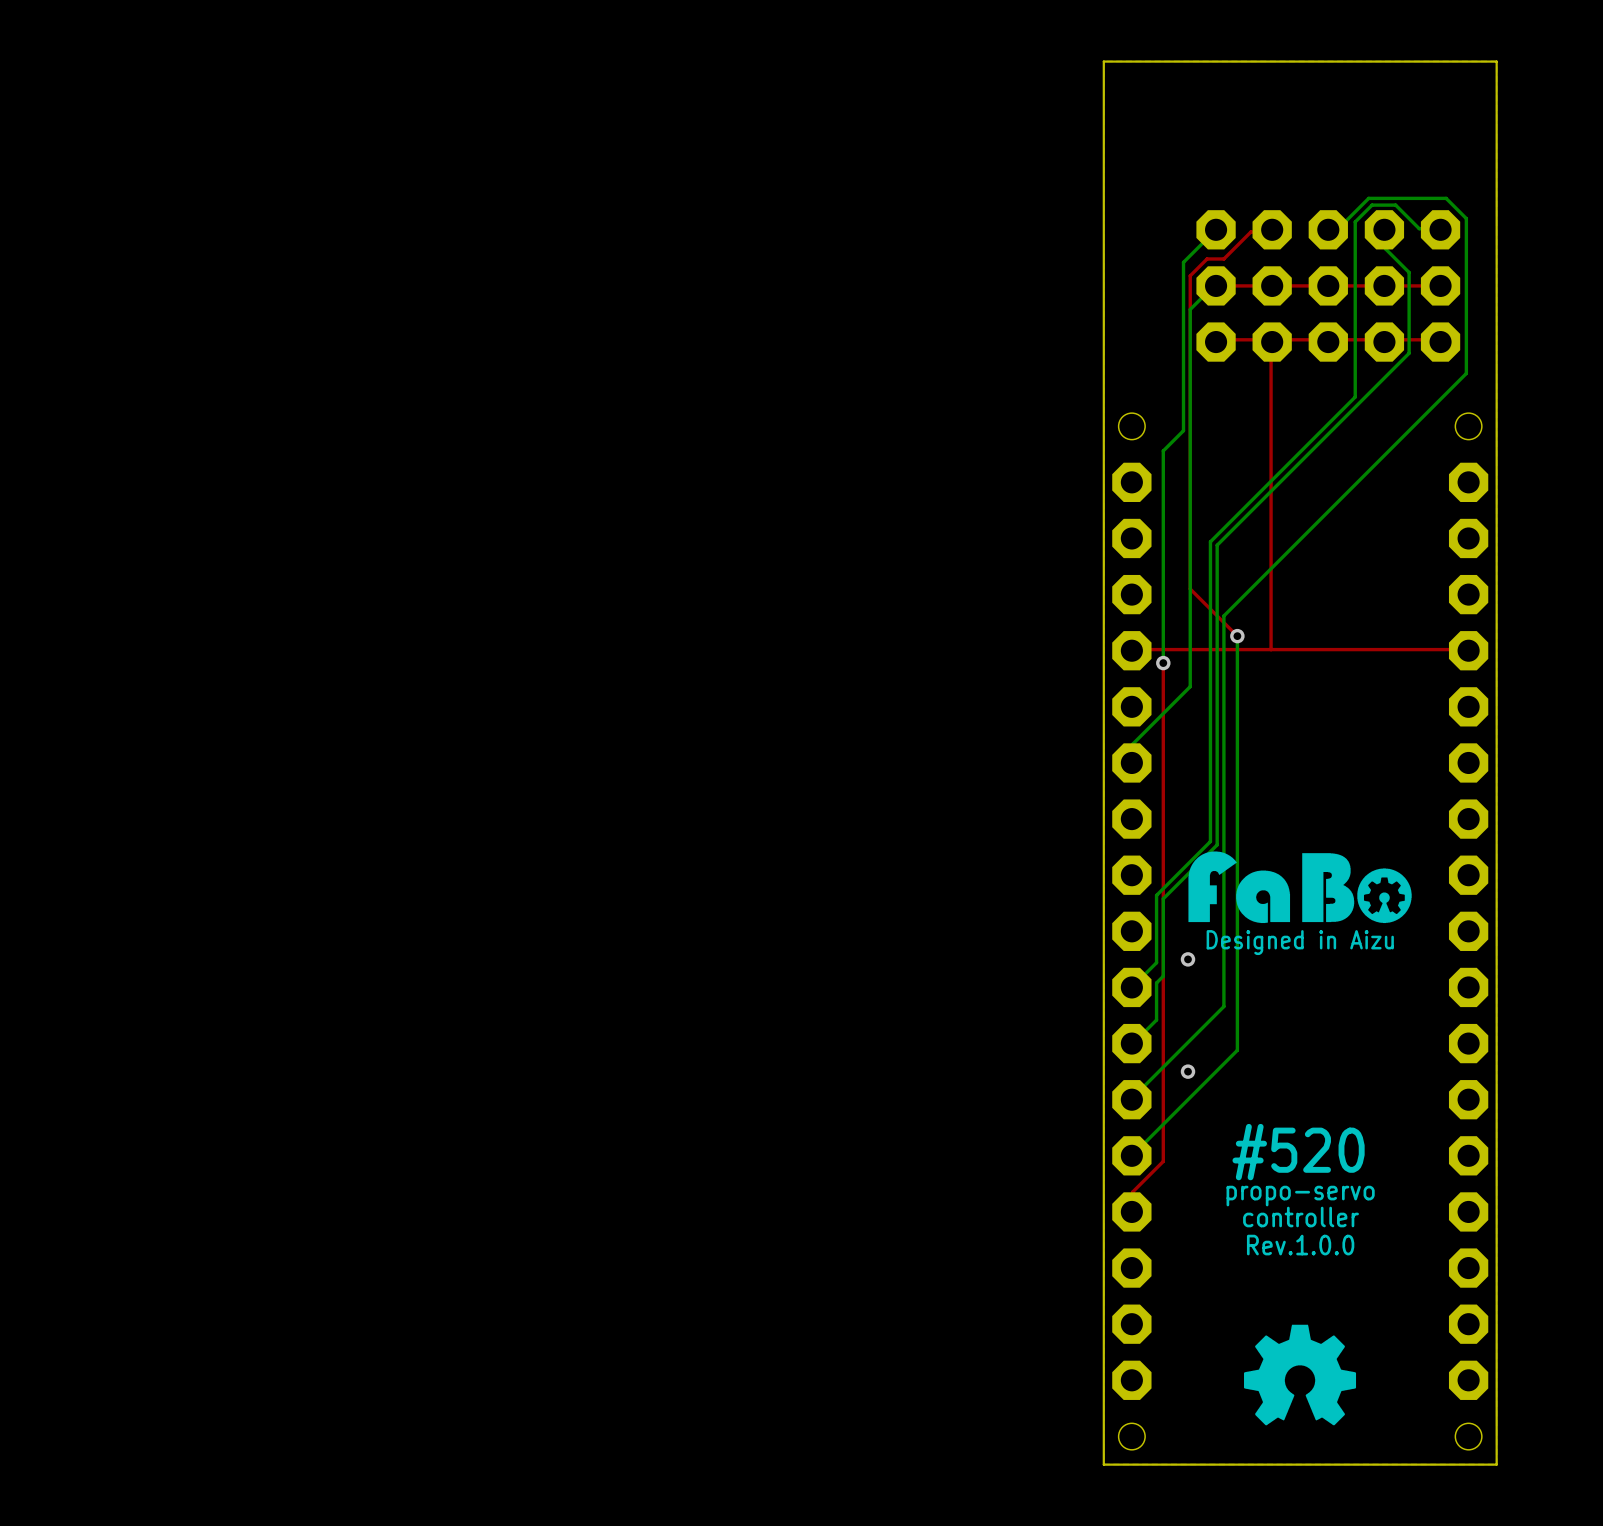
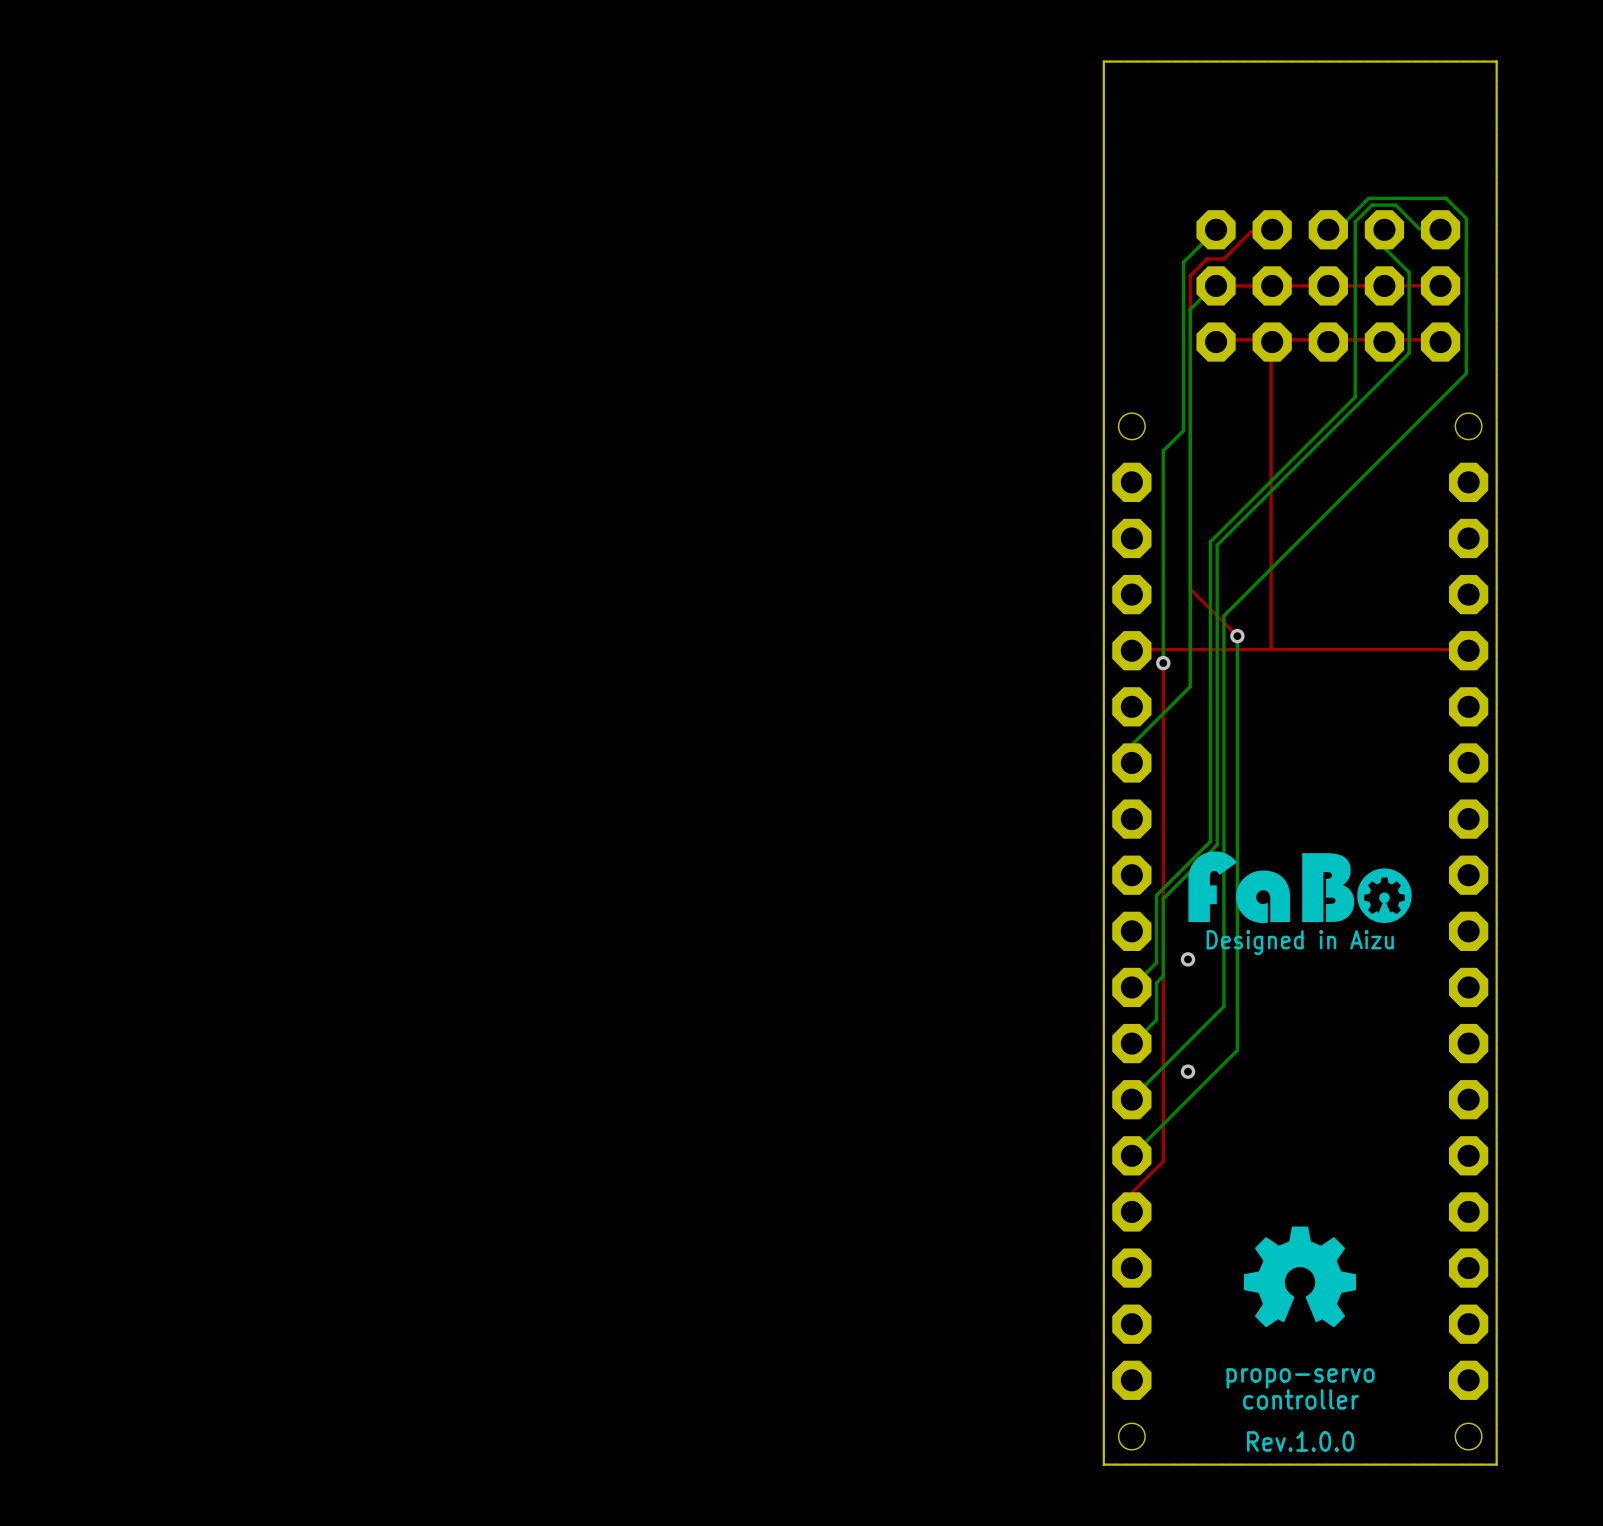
text: #520 (1298, 1152) -> none
text position: propo-servo (1300, 1196) -> propo-servo (1300, 1378)
text position: controller (1301, 1216) -> controller (1301, 1399)
text position: Rev.1.0.0 (1300, 1245) -> Rev.1.0.0 (1300, 1441)
drawing position: (1300, 1375) -> (1300, 1276)

